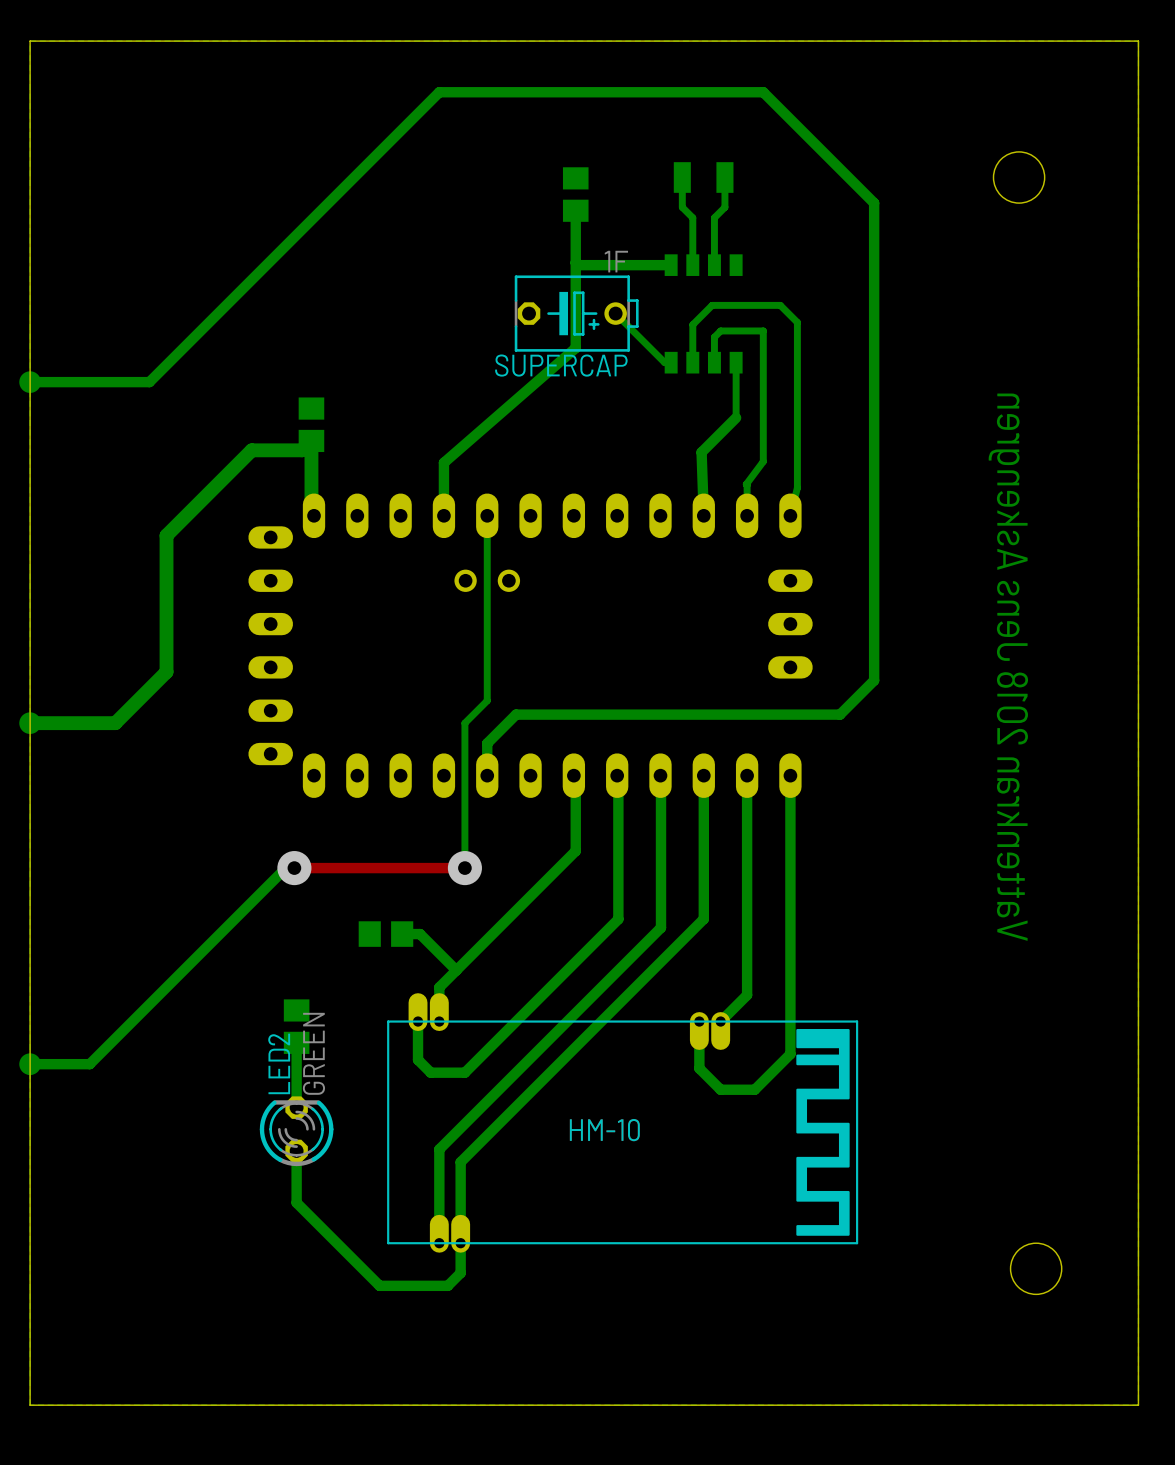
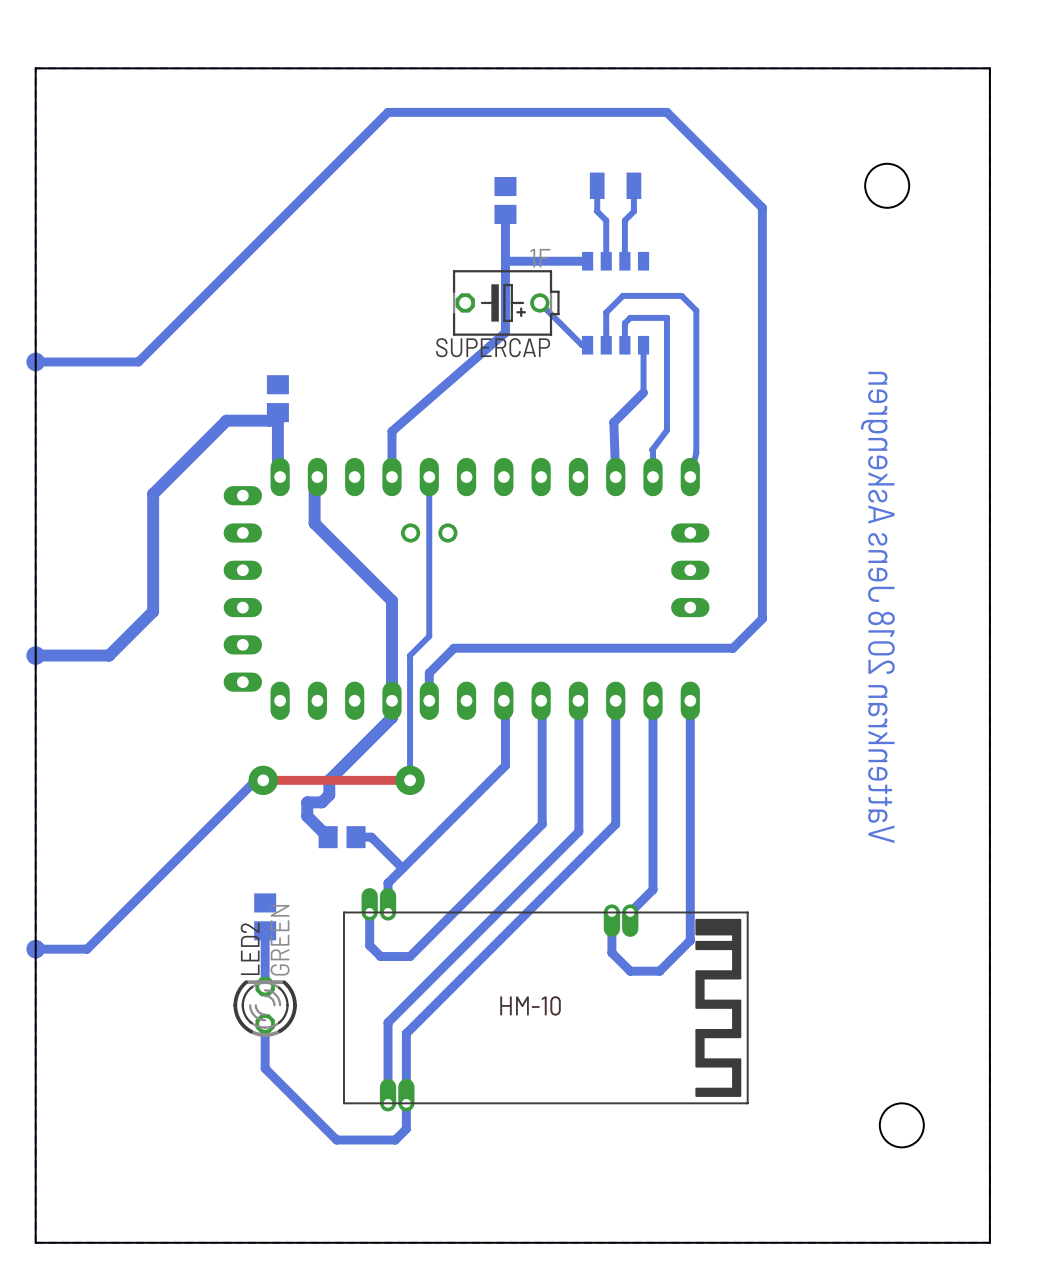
bottom track: none -> (317, 477) (314, 479) (314, 523) (391, 600) (391, 717) (329, 780) (329, 795) (321, 802) (307, 802) (307, 816) (328, 837)

